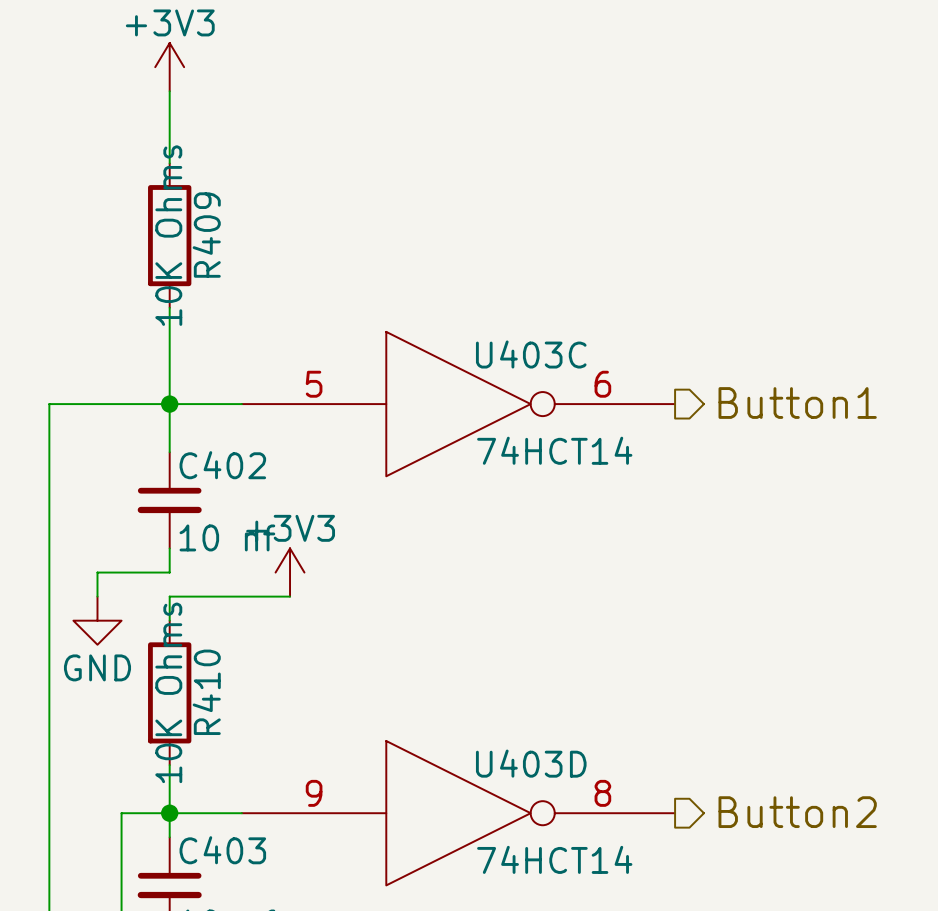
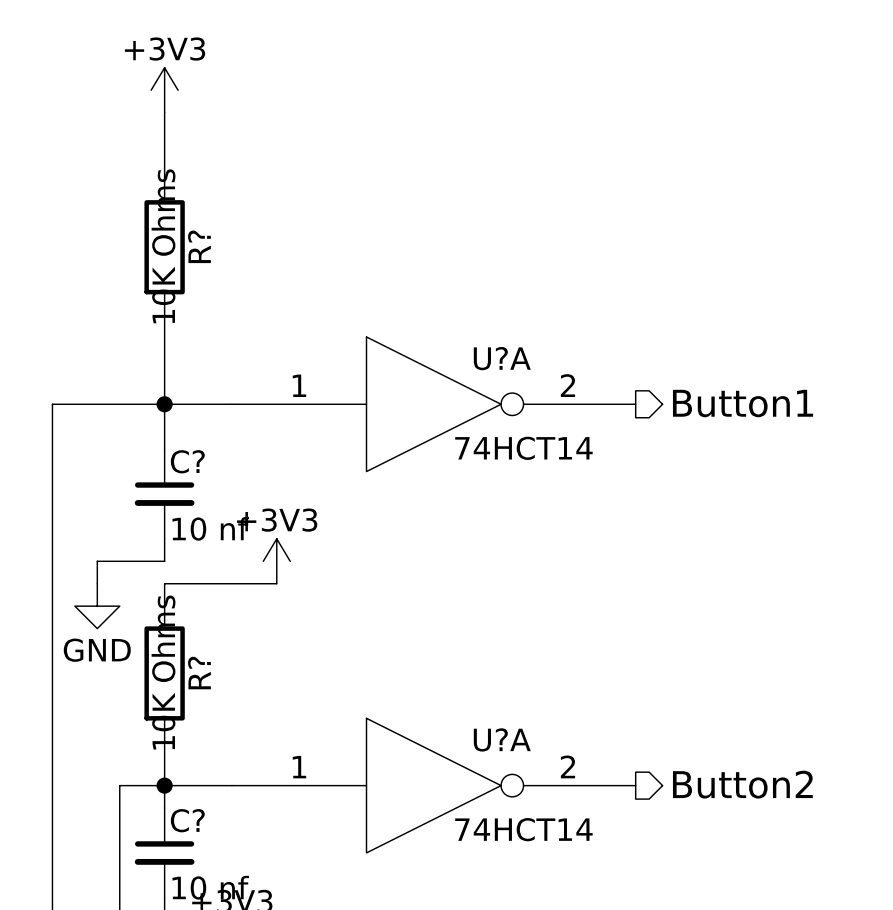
R409 name: R409 (206, 235) -> R? (199, 246)
U403C name: U403C (531, 354) -> U?A (502, 358)
U403C pin number: 5 (314, 384) -> 1 (299, 385)
U403C pin number: 6 (602, 384) -> 2 (567, 385)
C402 name: C402 (222, 465) -> C? (187, 461)
R410 name: R410 (206, 692) -> R? (199, 673)
U403D name: U403D (531, 763) -> U?A (502, 739)
U403D pin number: 9 (314, 793) -> 1 (299, 767)
U403D pin number: 8 (602, 793) -> 2 (567, 766)
C403 name: C403 (222, 850) -> C? (187, 820)

